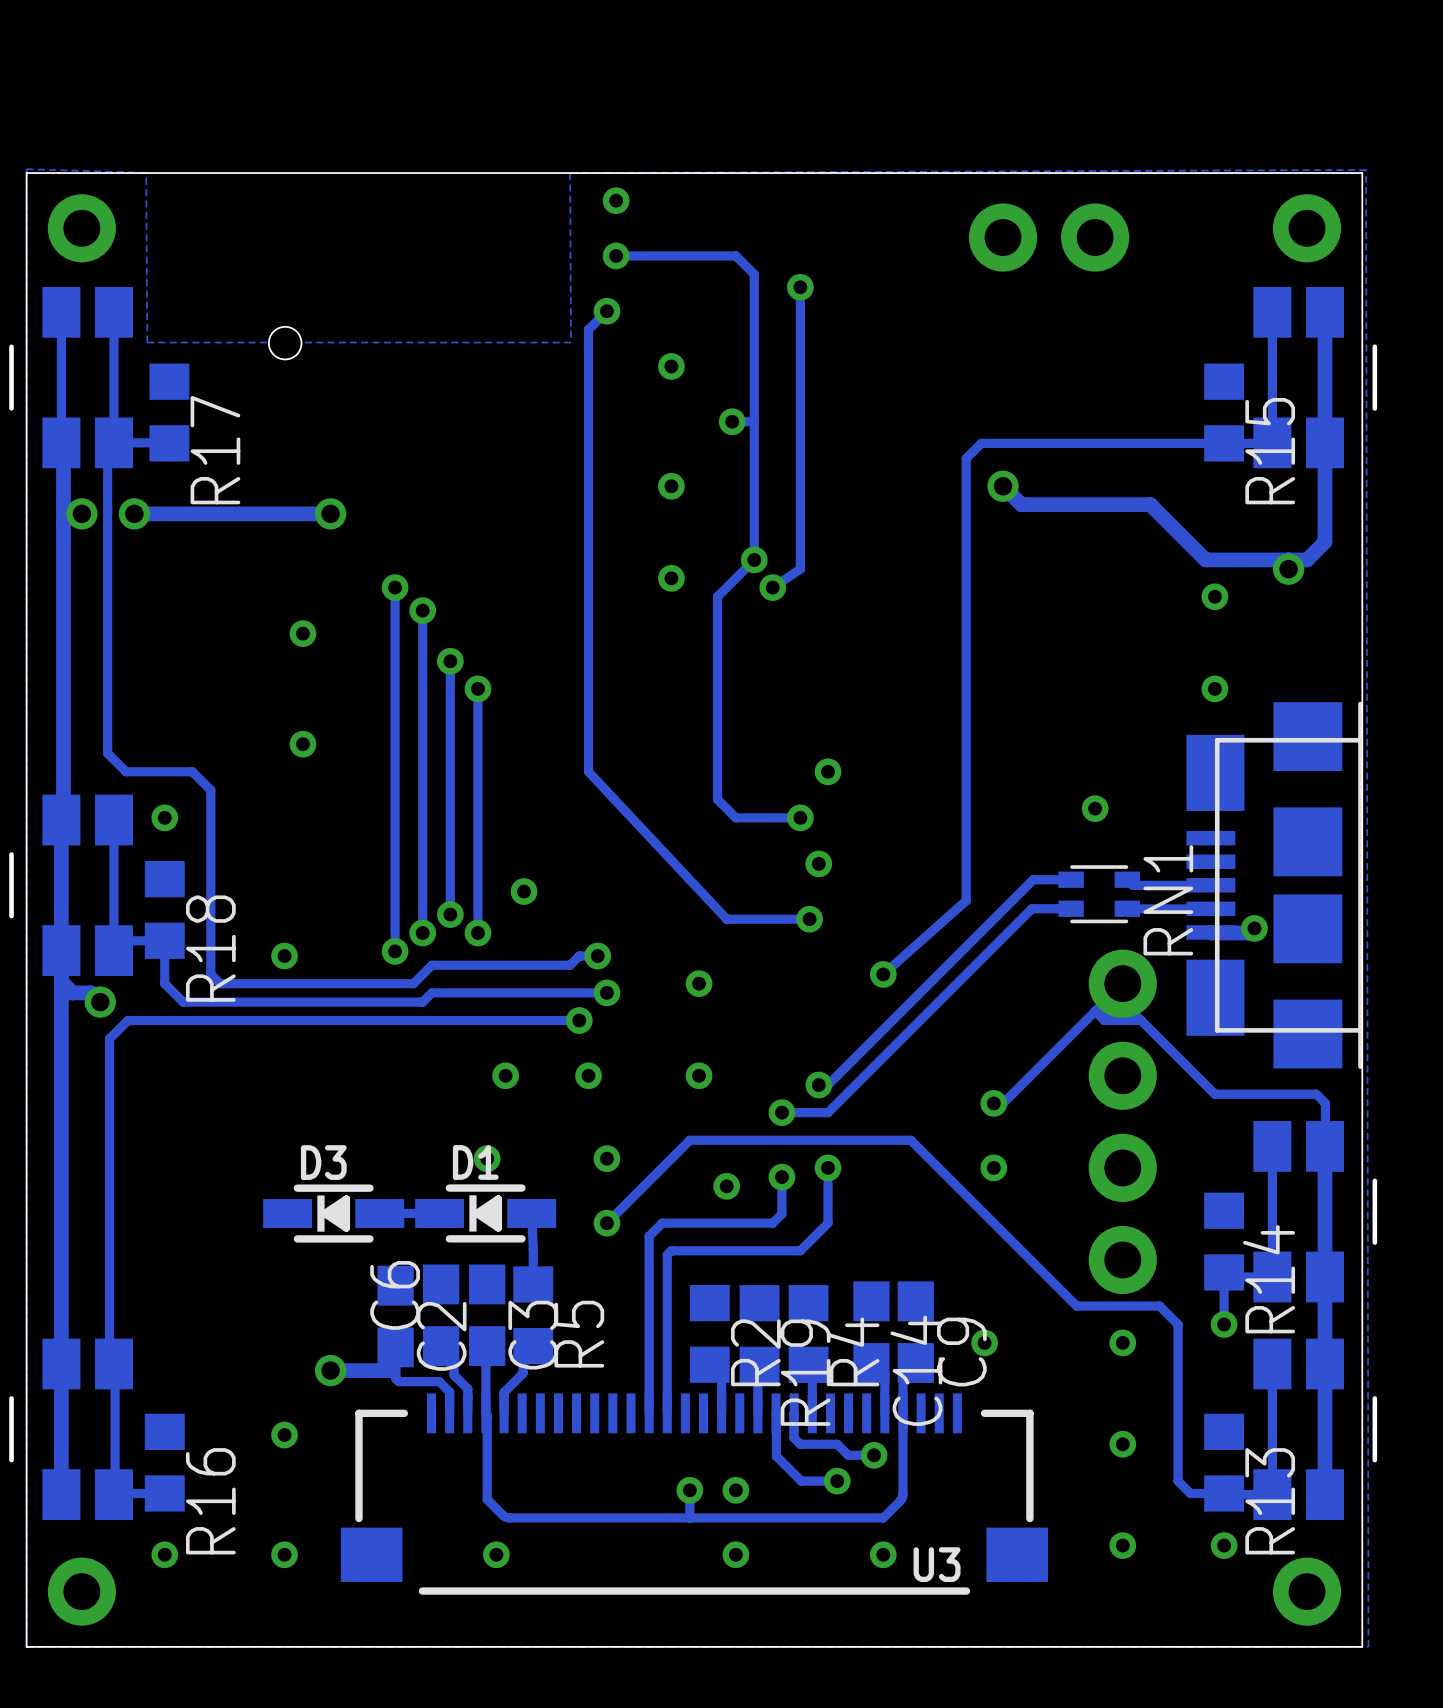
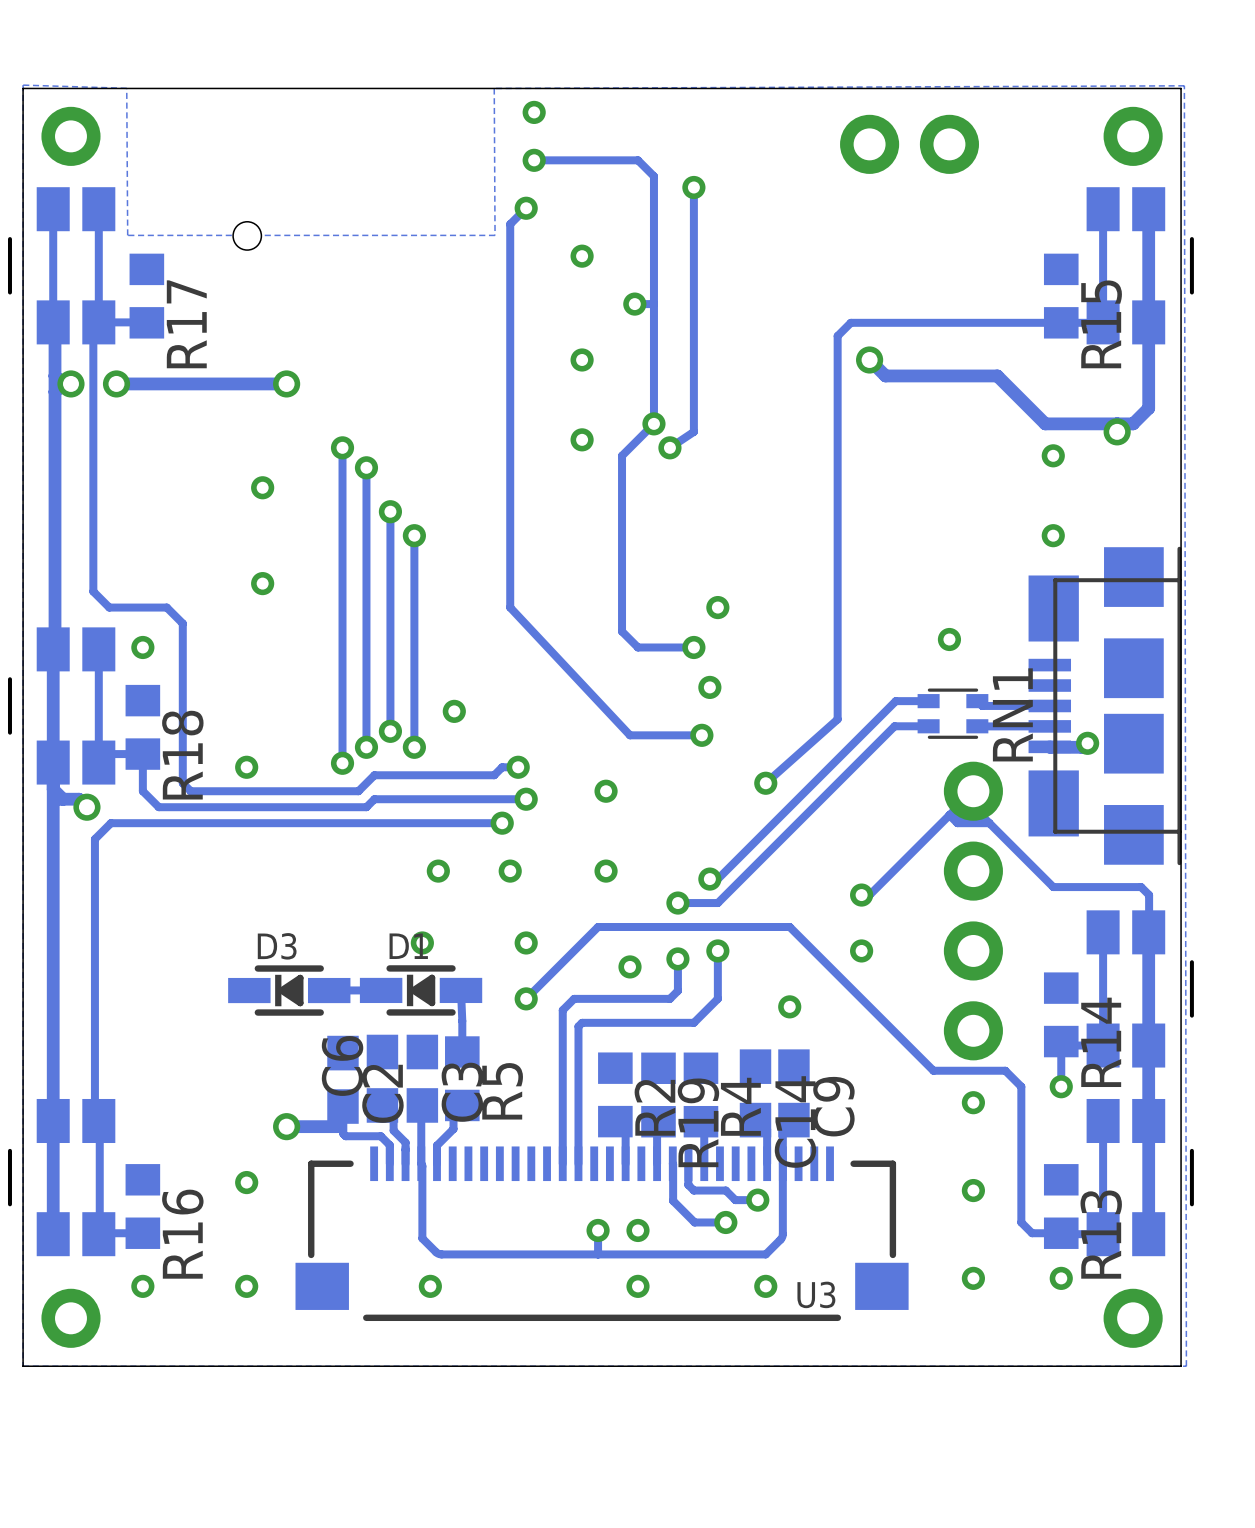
via position: (984, 1342) -> (789, 1006)

